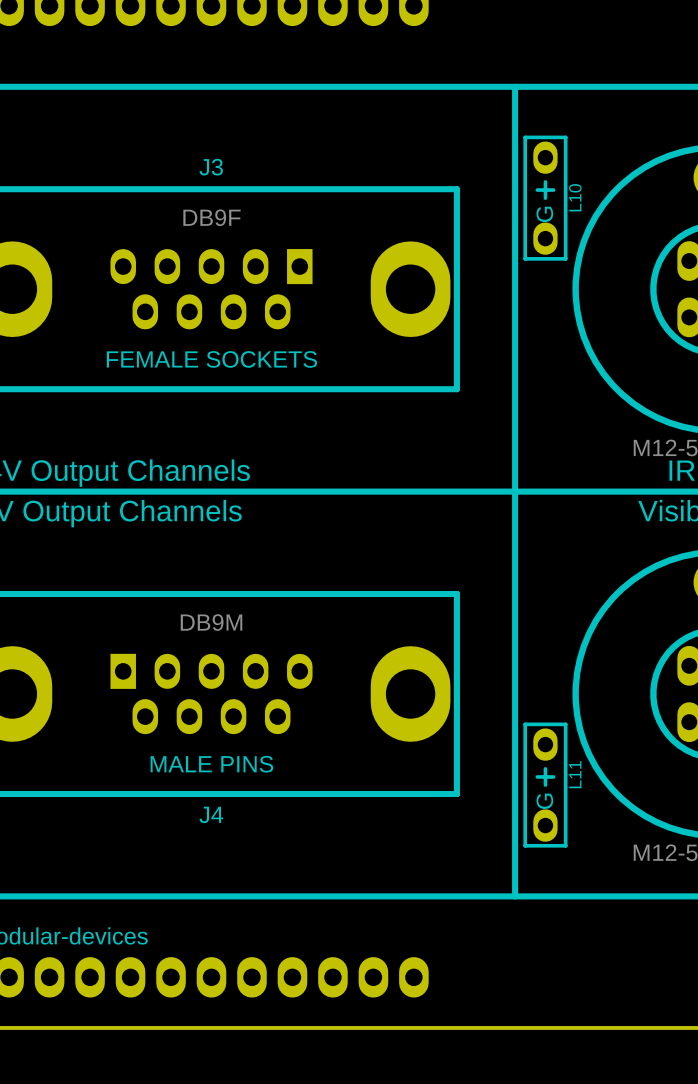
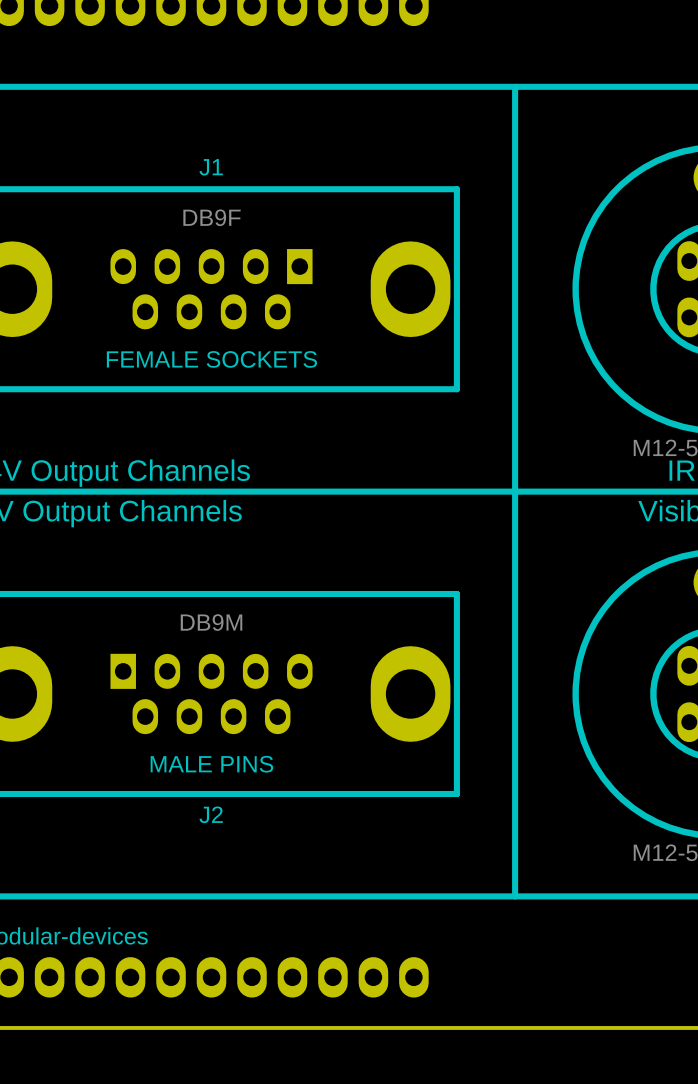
J3 name: J3 (211, 167) -> J1 (211, 167)
L10: (545, 198) -> none
L11: (545, 785) -> none
J4 name: J4 (211, 814) -> J2 (211, 814)

